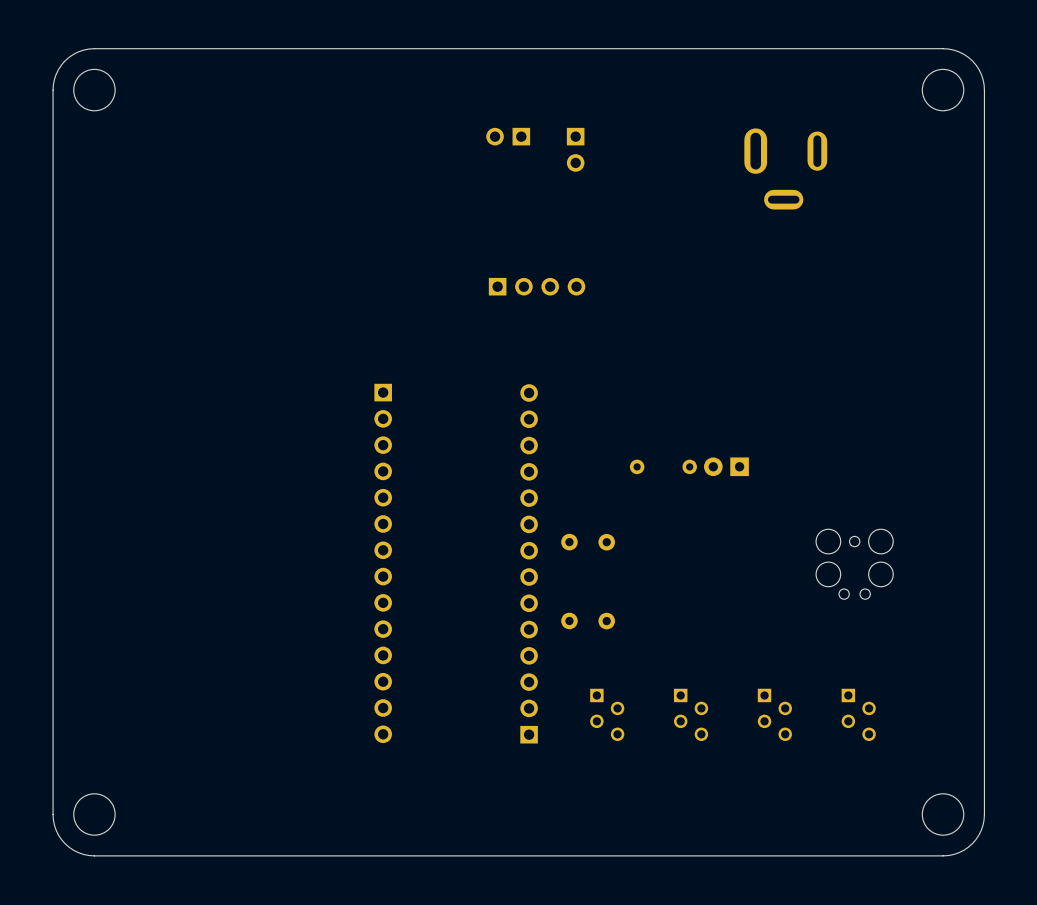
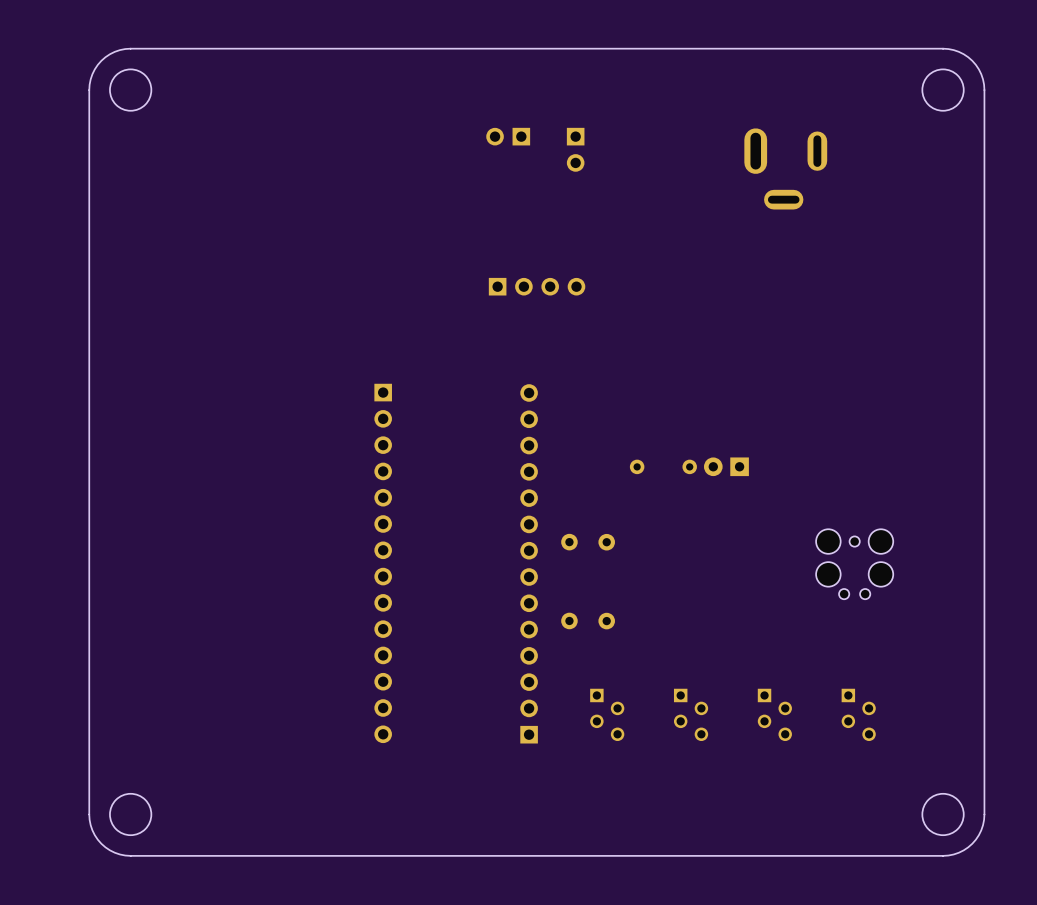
board edge: (130, 48) (89, 49) (73, 54) (58, 69) (53, 90) (53, 819) (61, 839) (78, 852) (94, 855) (130, 855) -> (130, 48) (114, 51) (101, 60) (92, 74) (89, 90) (89, 814) (92, 830) (101, 843) (114, 852) (130, 855)
round board edge position: (94, 90) -> (130, 90)
round board edge position: (94, 814) -> (130, 814)

